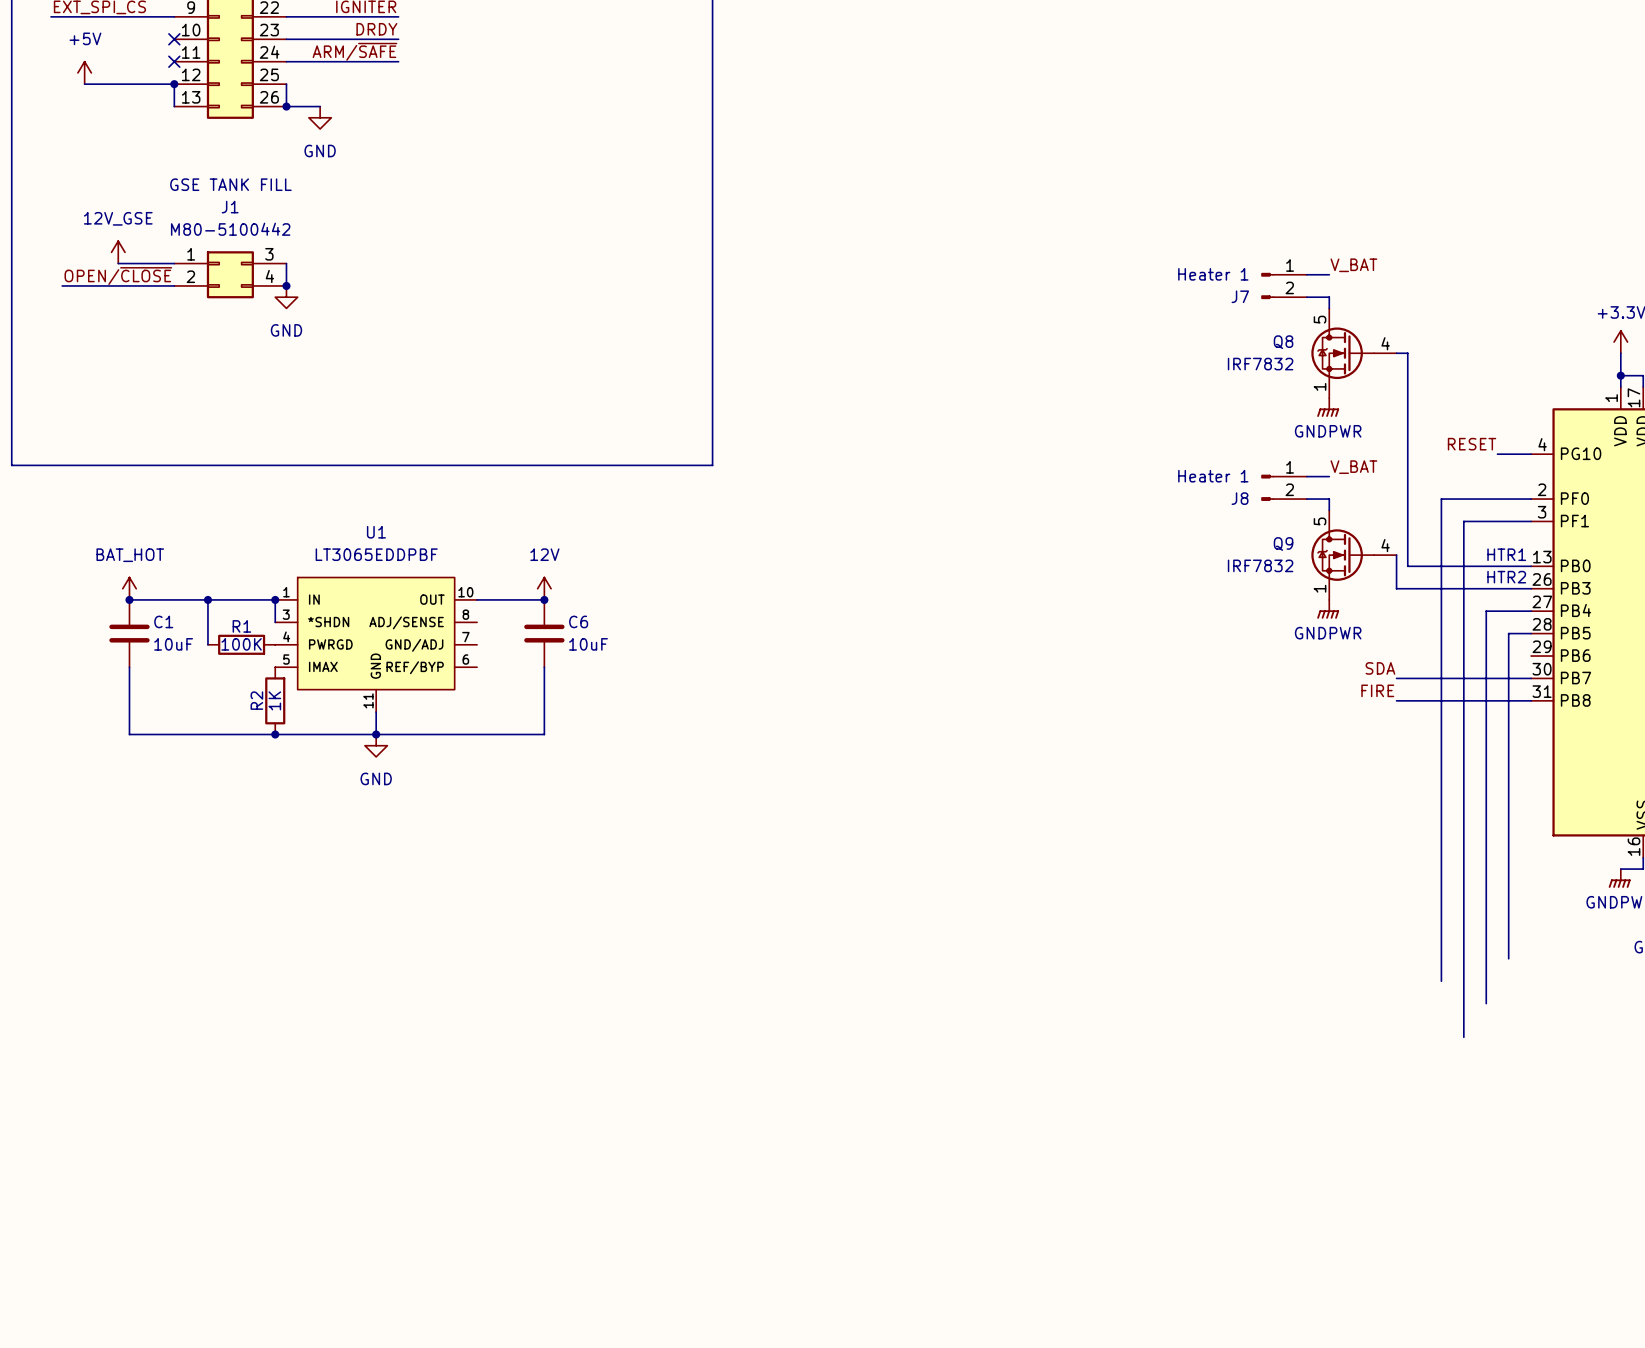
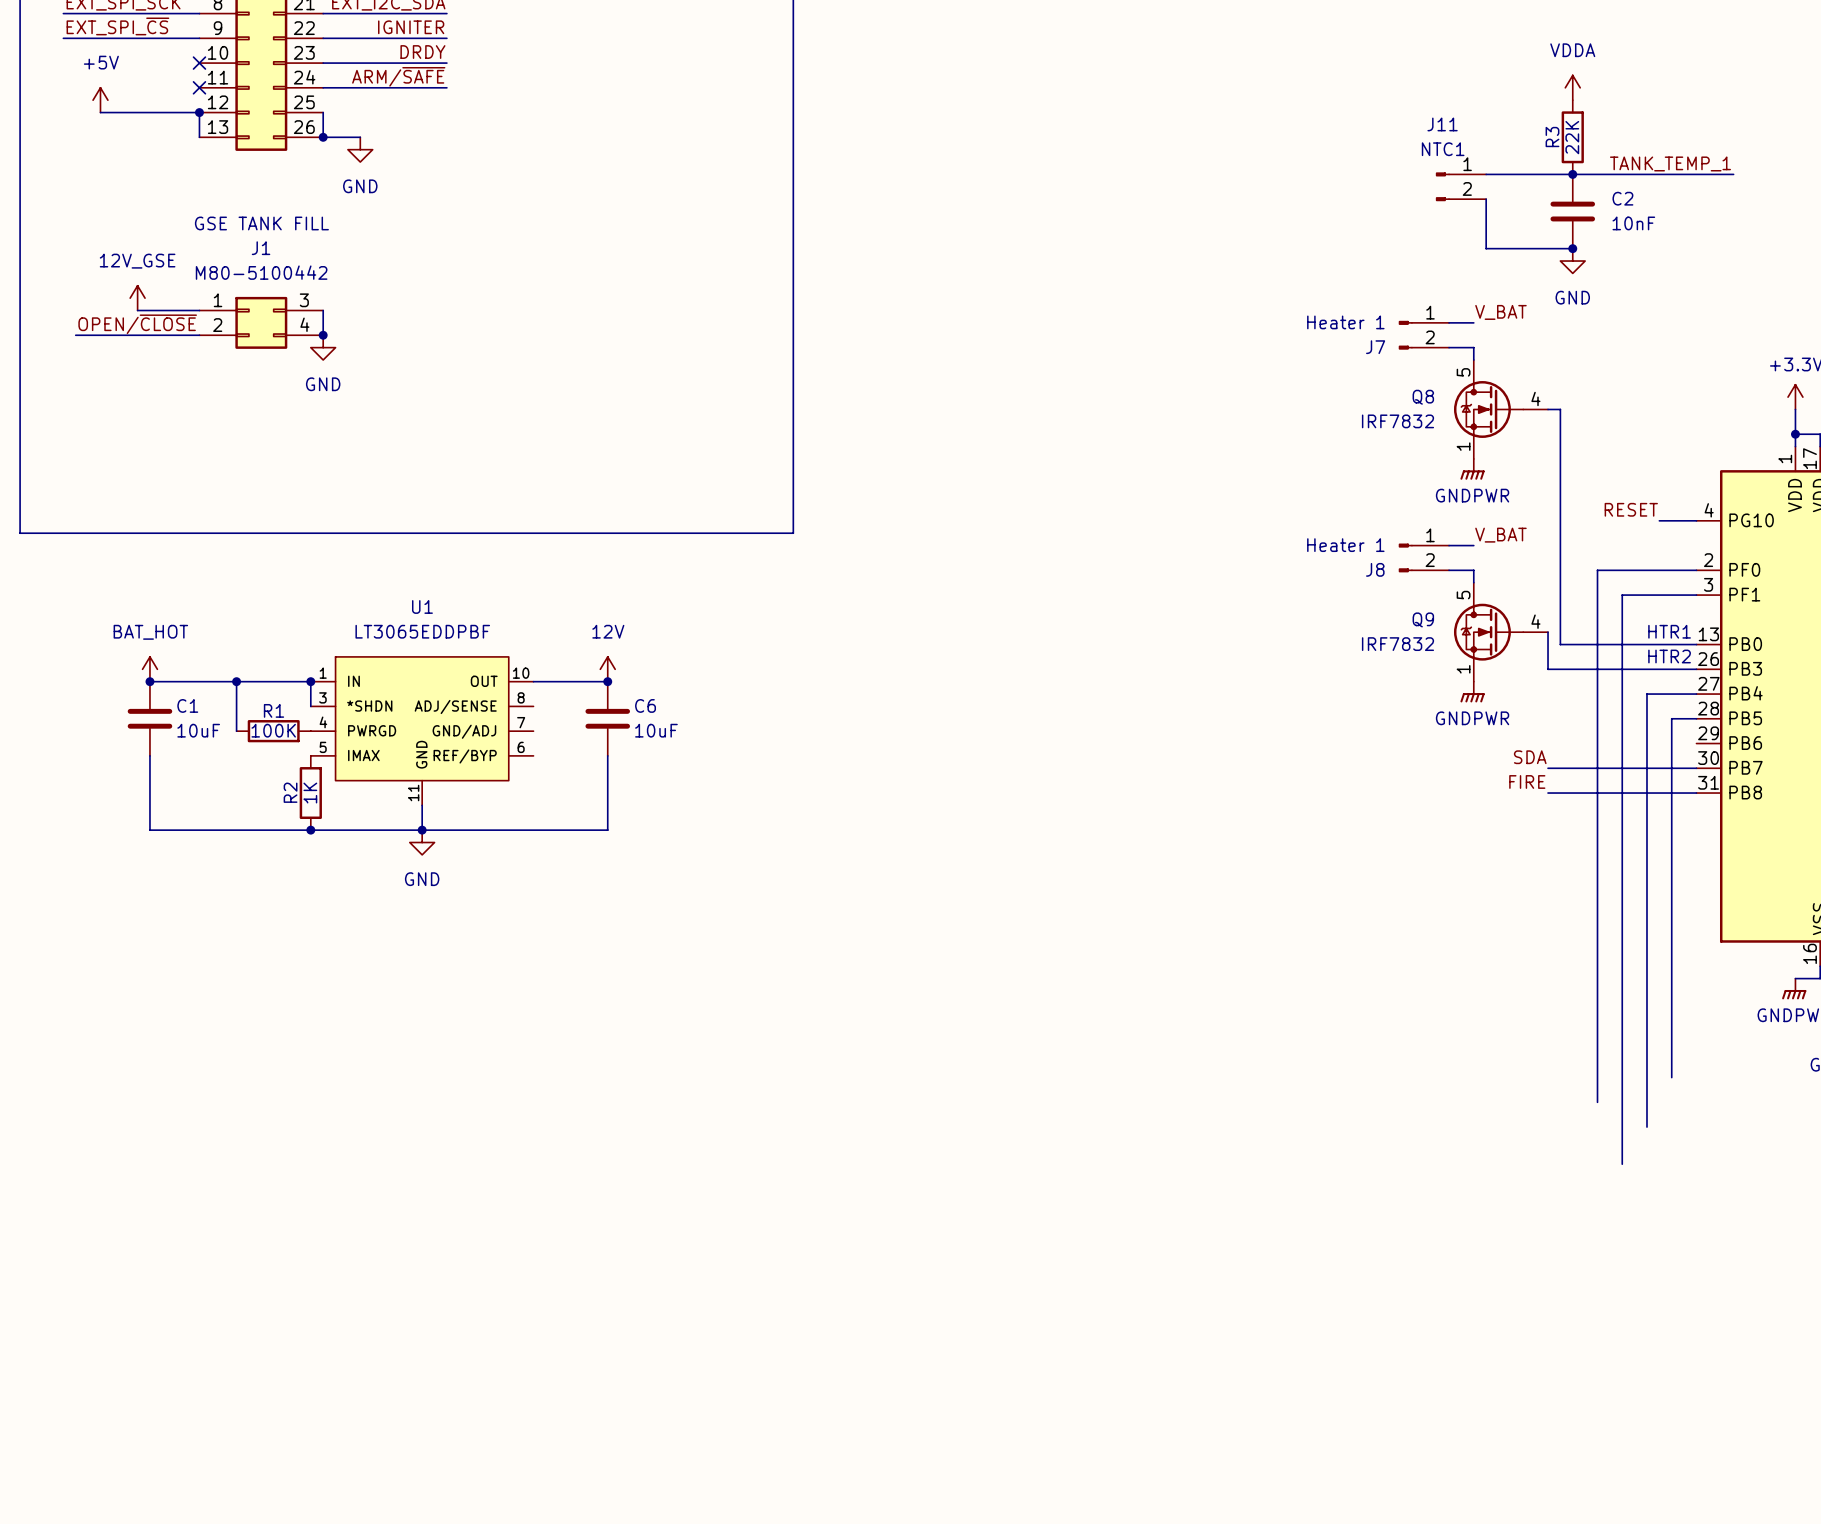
power symbol: none -> VDDA (1572, 87)
R3: none -> 22K (1572, 137)
label: none -> TANK_TEMP_1 (1670, 163)
wire: none -> (1486, 174) (1733, 174)
junction: none -> (1572, 174)
J11: none -> NTC1 (1461, 186)
wire: none -> (1486, 199) (1486, 248) (1572, 248)
C2: none -> 10nF (1572, 211)
junction: none -> (1572, 248)
power symbol: none -> GND (1572, 261)

